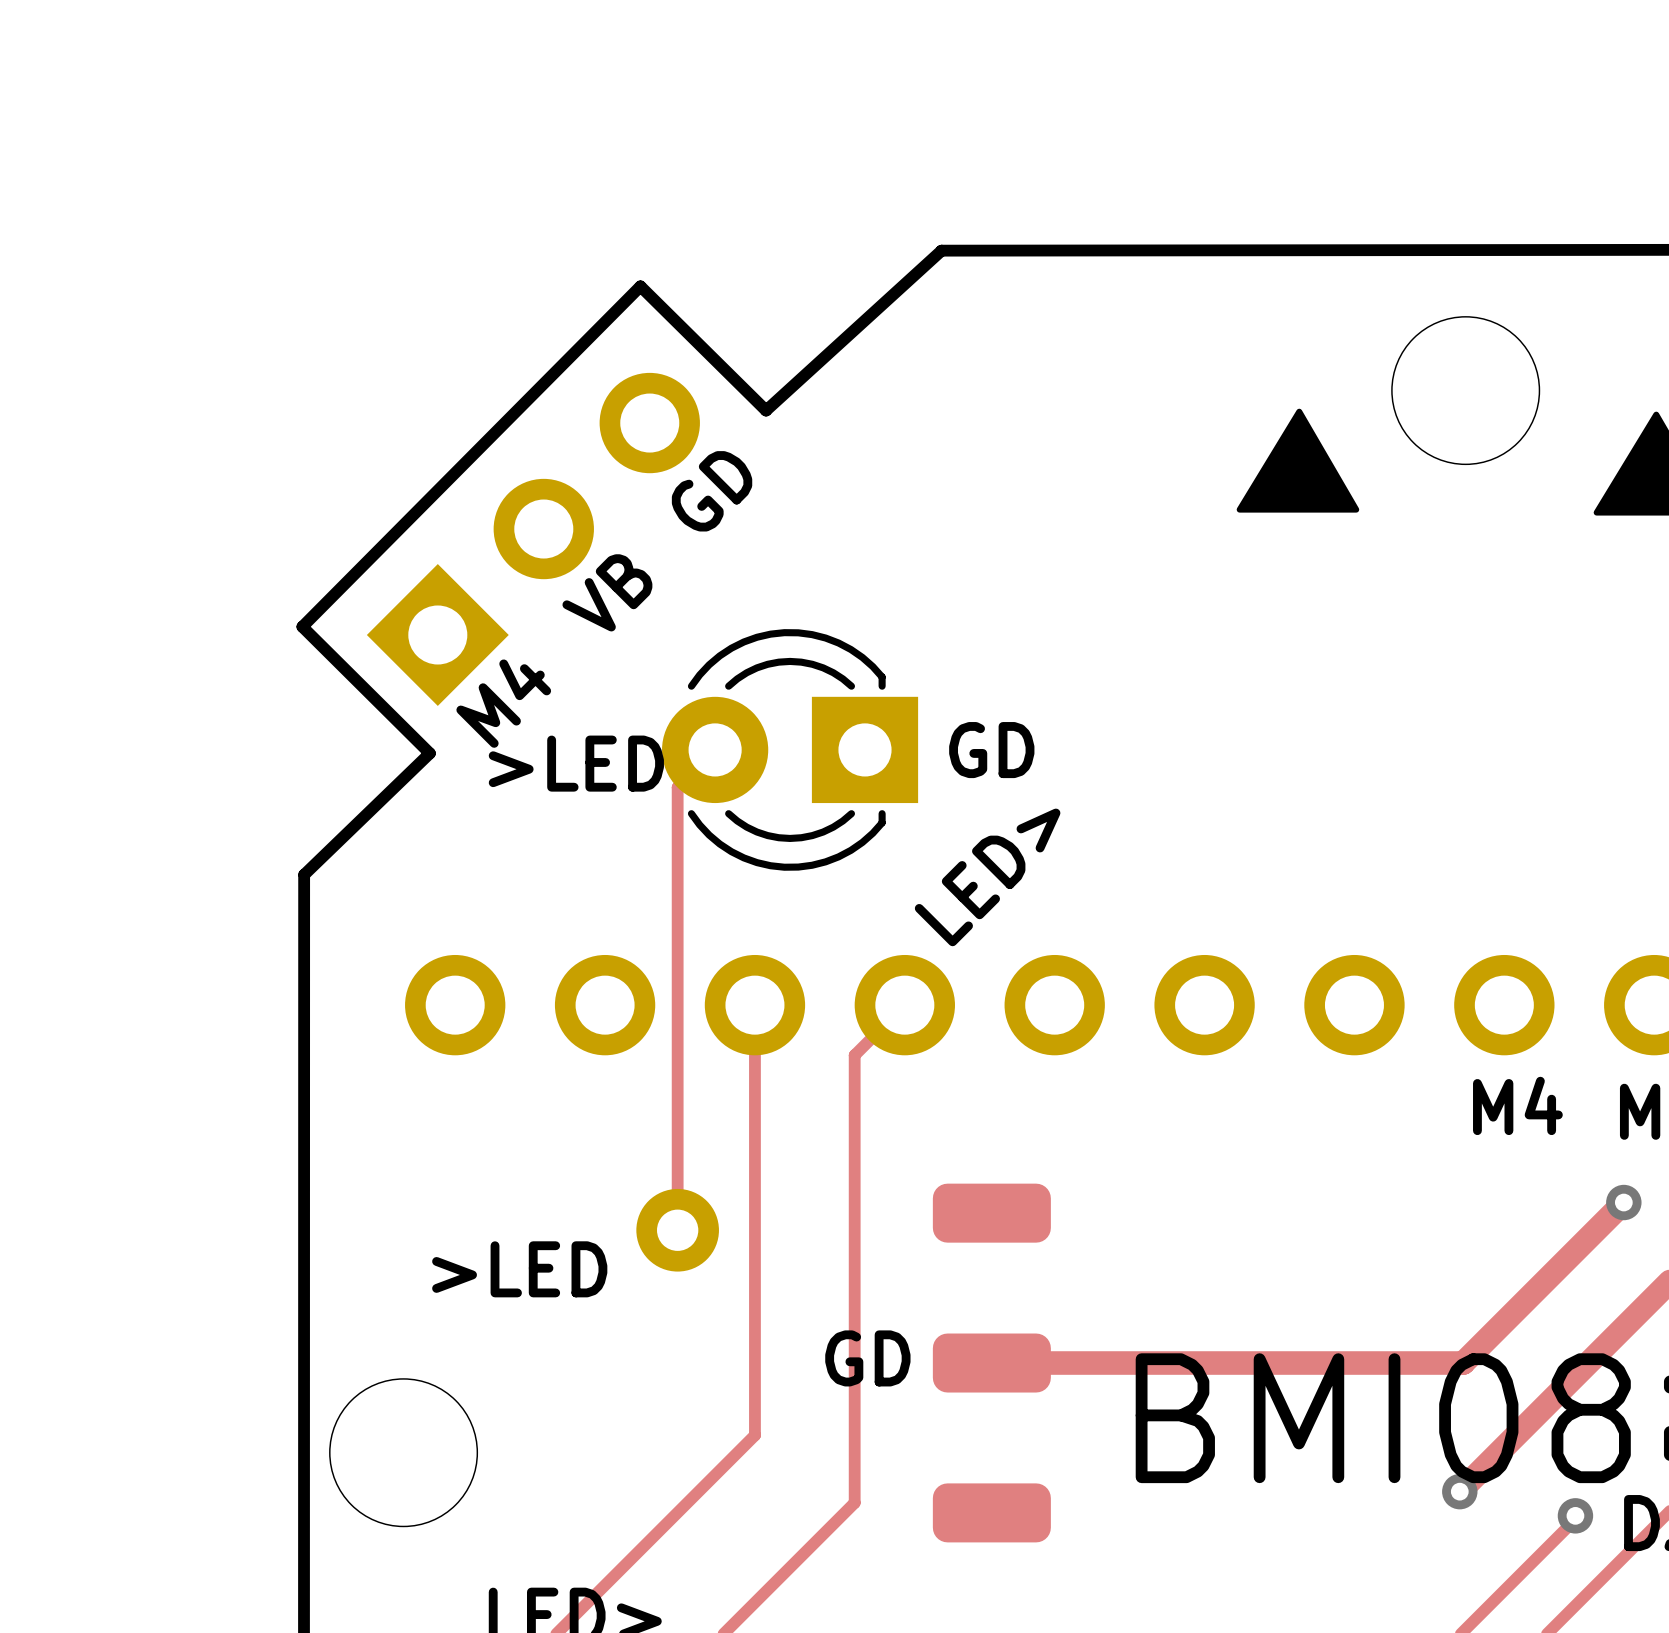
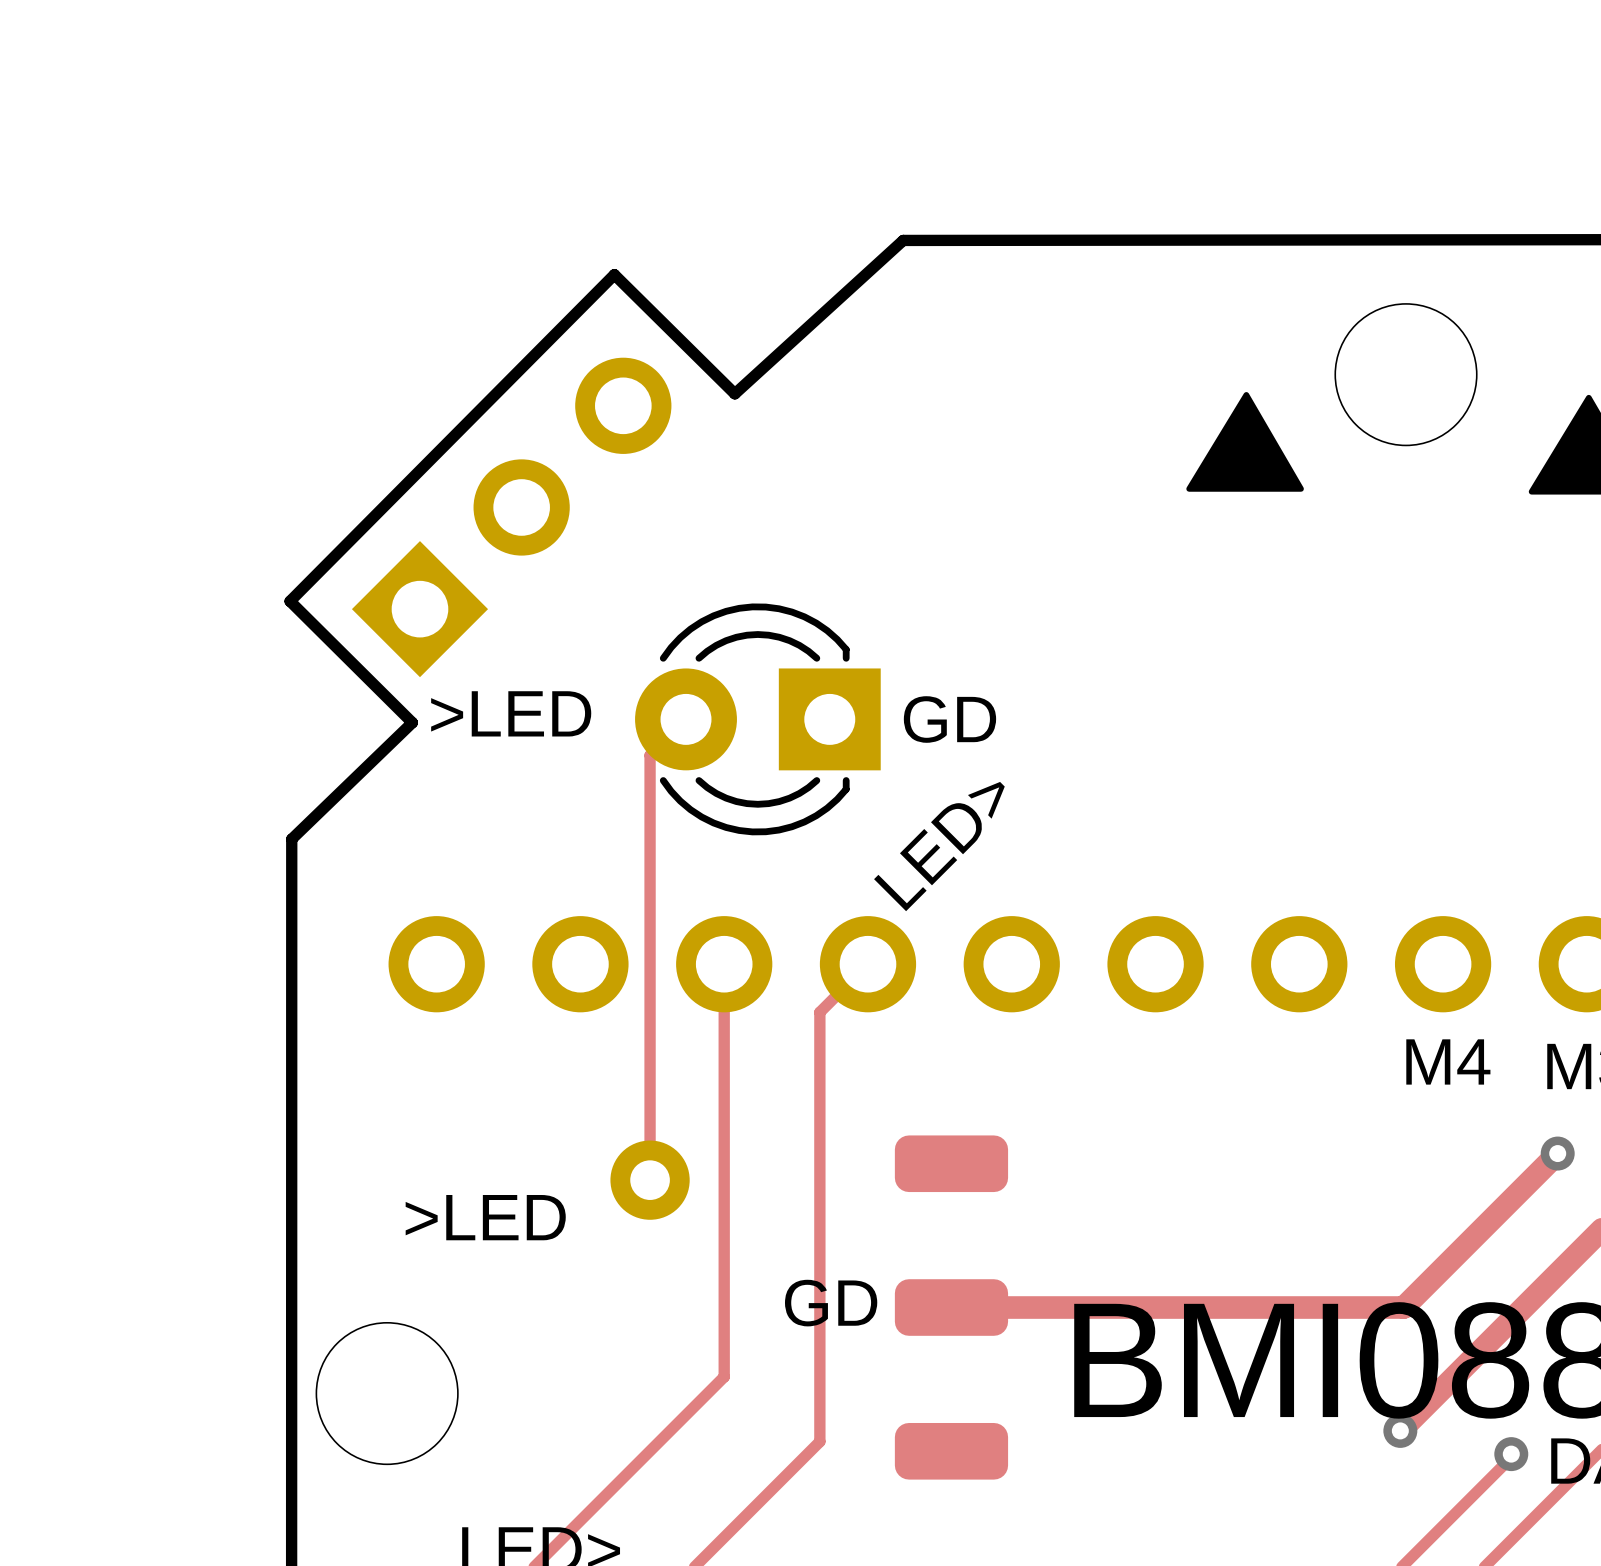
text: GD (712, 491) -> none
text: VB (607, 592) -> none
text: M4 (503, 703) -> none
text position: >LED (576, 763) -> >LED (511, 713)

